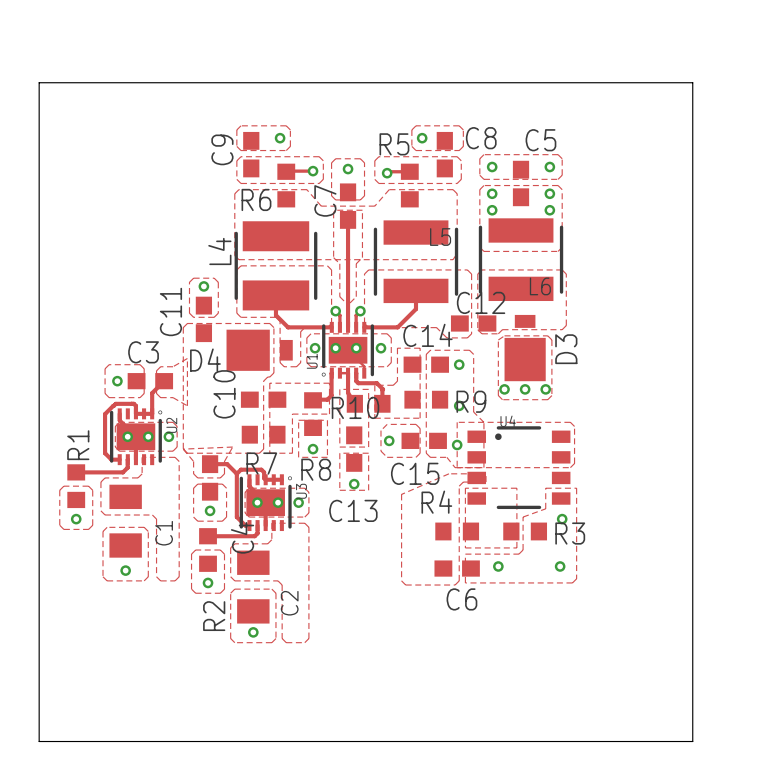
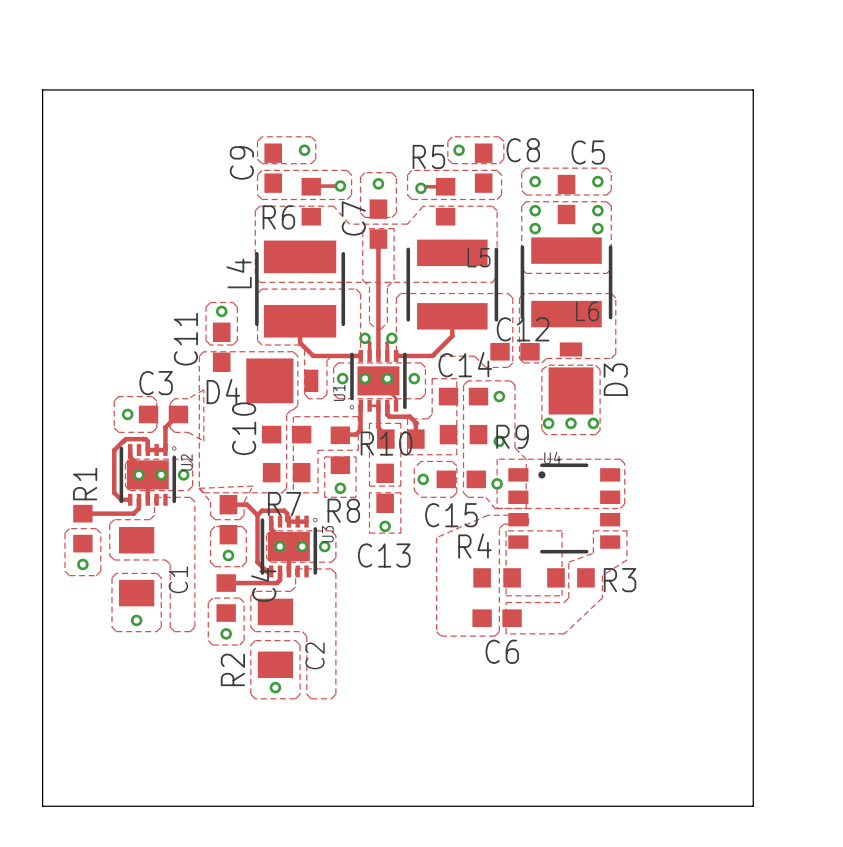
zone outline: (576, 515) (576, 578) (572, 582) (518, 582) -> (626, 559) (602, 575) (602, 598) (564, 633)
via: (562, 519) -> none
via: (498, 566) -> none
via: (560, 566) -> none

